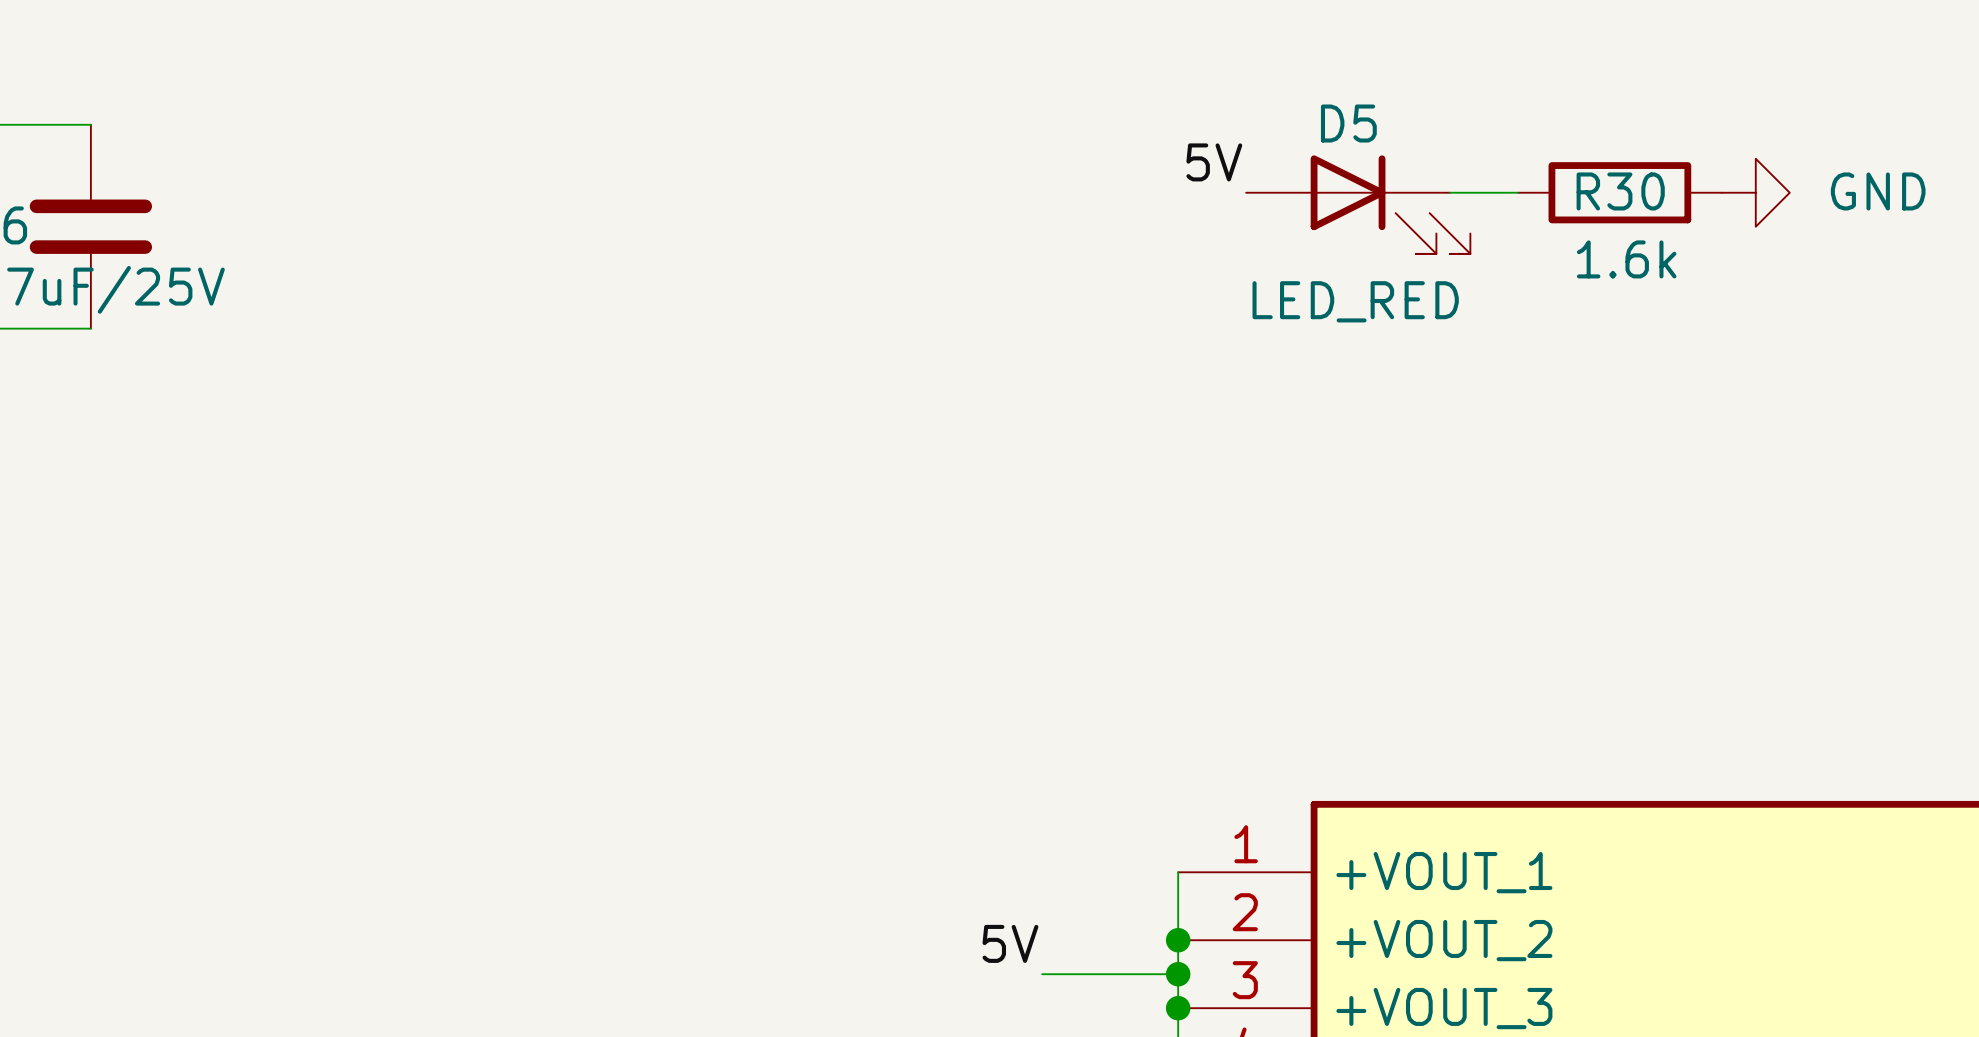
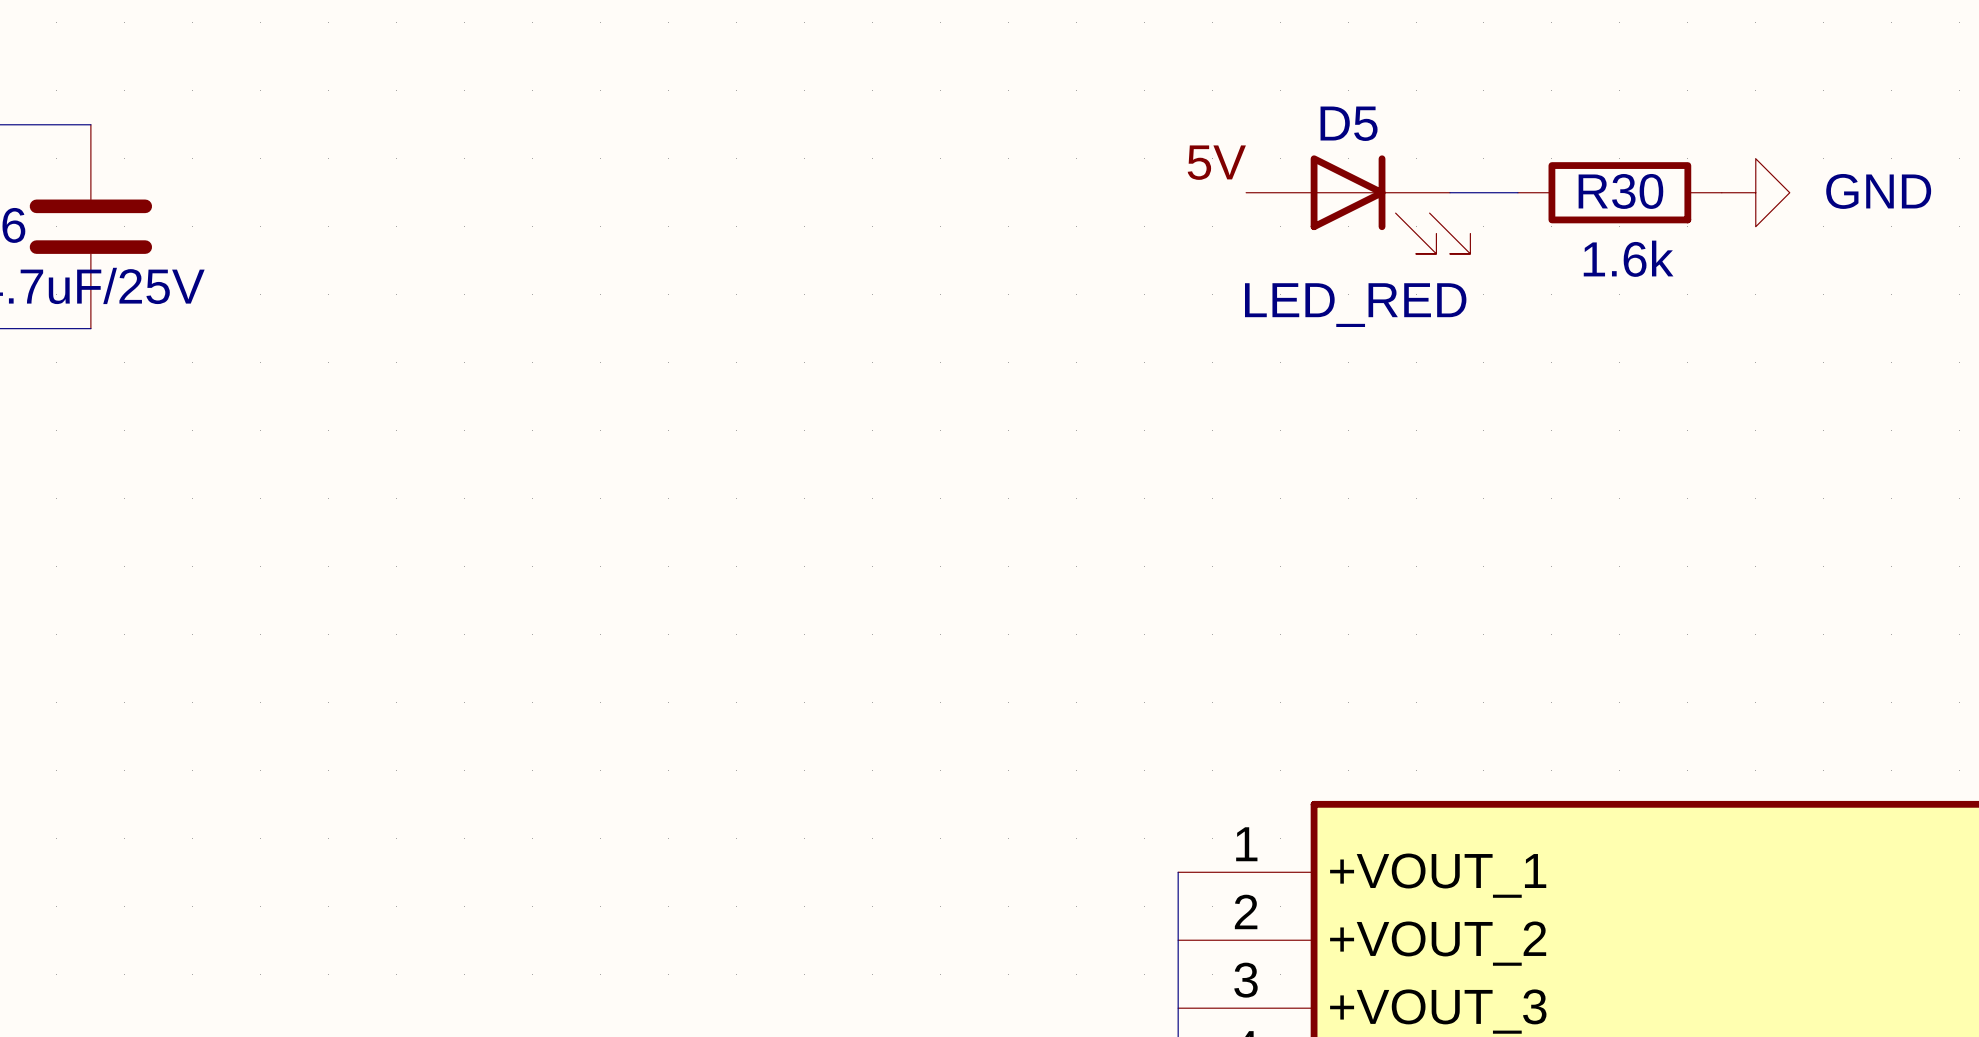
junction: (1178, 940) -> none
label: 5V (1010, 943) -> none
wire: (1042, 974) (1178, 974) -> none
junction: (1178, 974) -> none
junction: (1178, 1008) -> none

